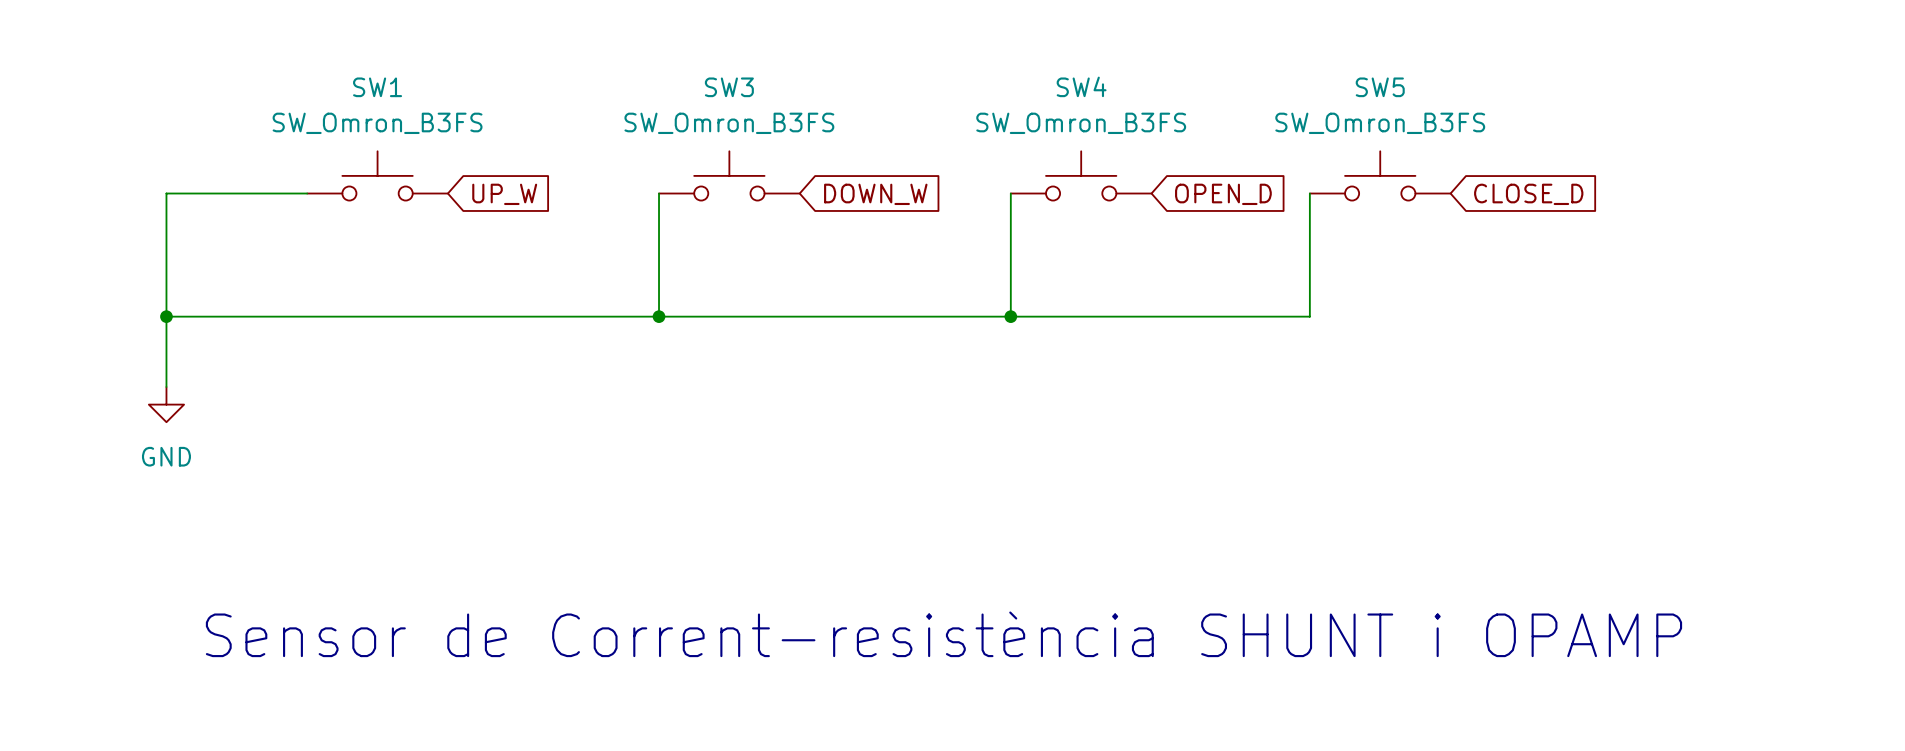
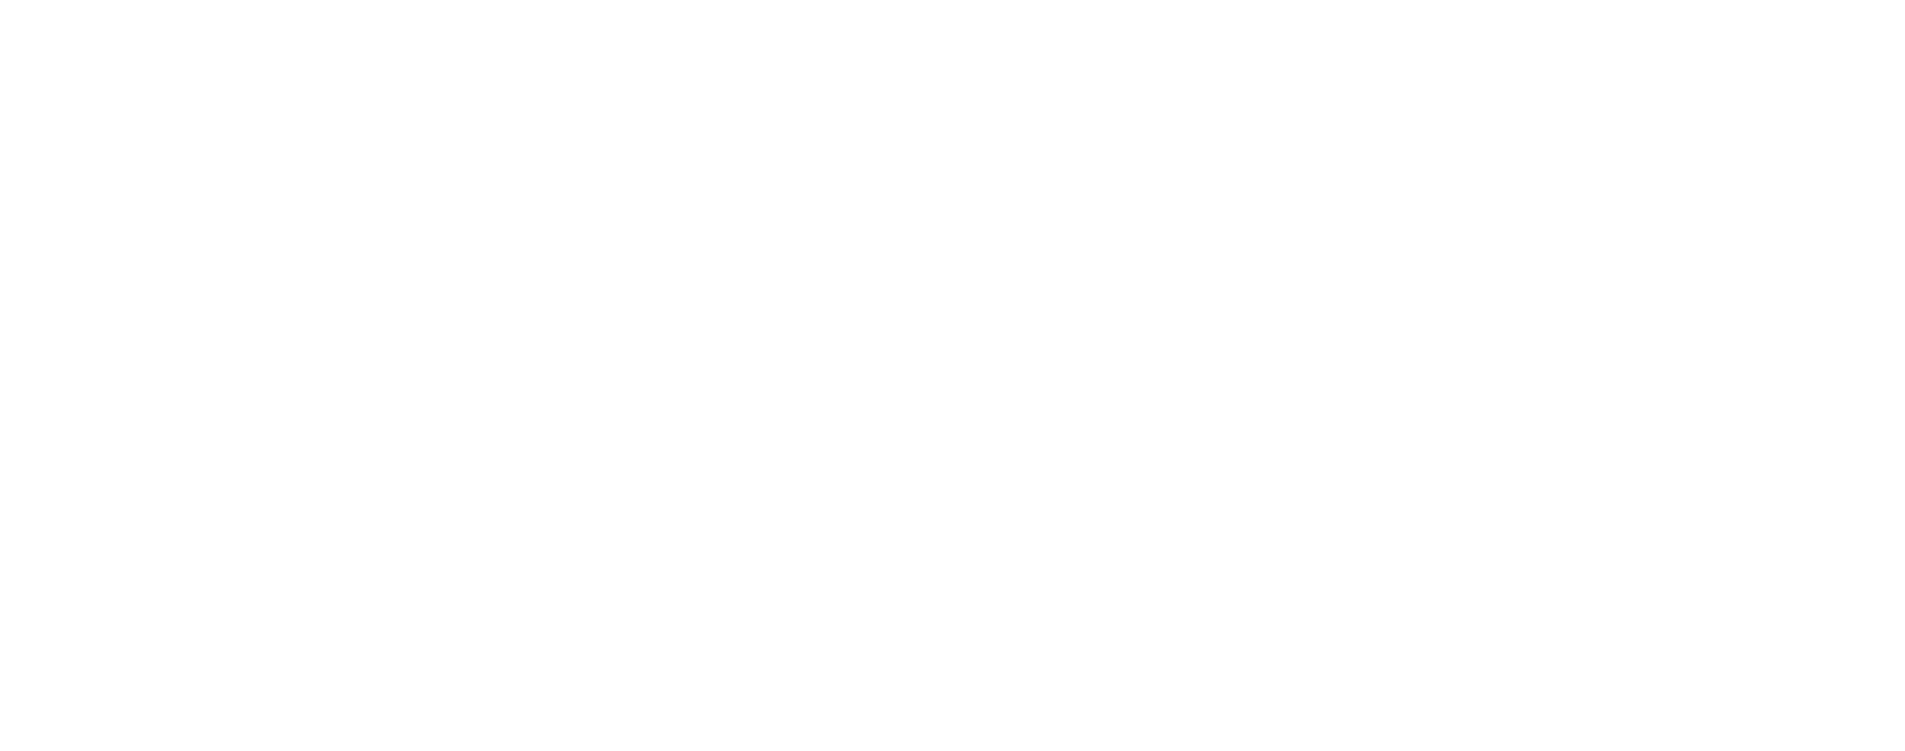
SW1: SW_Omron_B3FS (377, 175) -> none
SW3: SW_Omron_B3FS (729, 175) -> none
SW4: SW_Omron_B3FS (1081, 175) -> none
SW5: SW_Omron_B3FS (1380, 175) -> none
wire: (307, 193) (166, 193) (166, 387) -> none
wire: (659, 193) (659, 316) -> none
wire: (1010, 193) (1010, 316) -> none
wire: (1309, 193) (1309, 316) (166, 316) -> none
global label: UP_W (504, 194) -> none
global label: DOWN_W (875, 194) -> none
global label: OPEN_D (1223, 194) -> none
global label: CLOSE_D (1528, 194) -> none
junction: (166, 316) -> none
junction: (659, 316) -> none
junction: (1010, 316) -> none
power symbol: GND (166, 404) -> none
text: Sensor de Corrent-resistència SHUNT i OPAMP (943, 634) -> none

